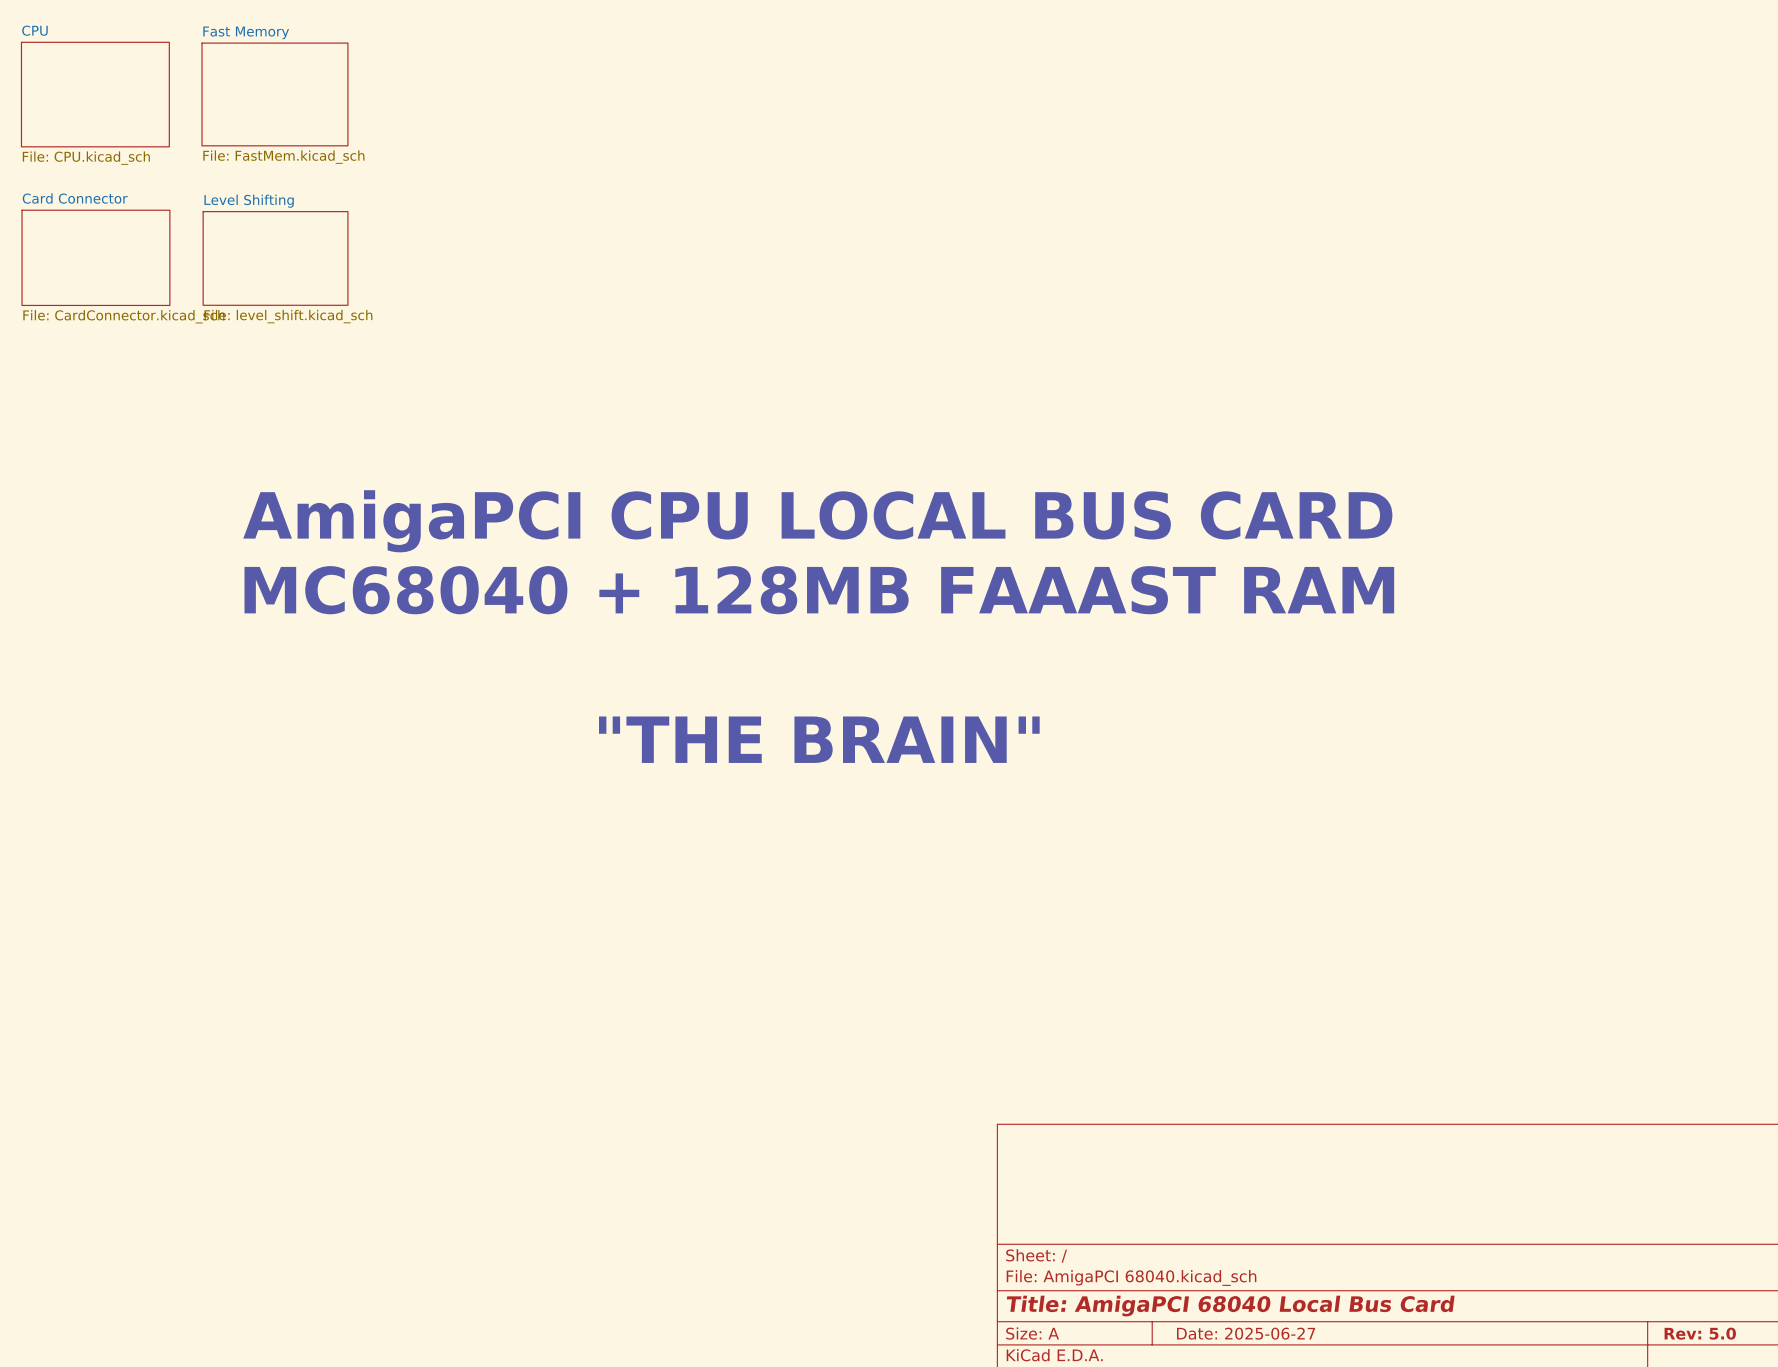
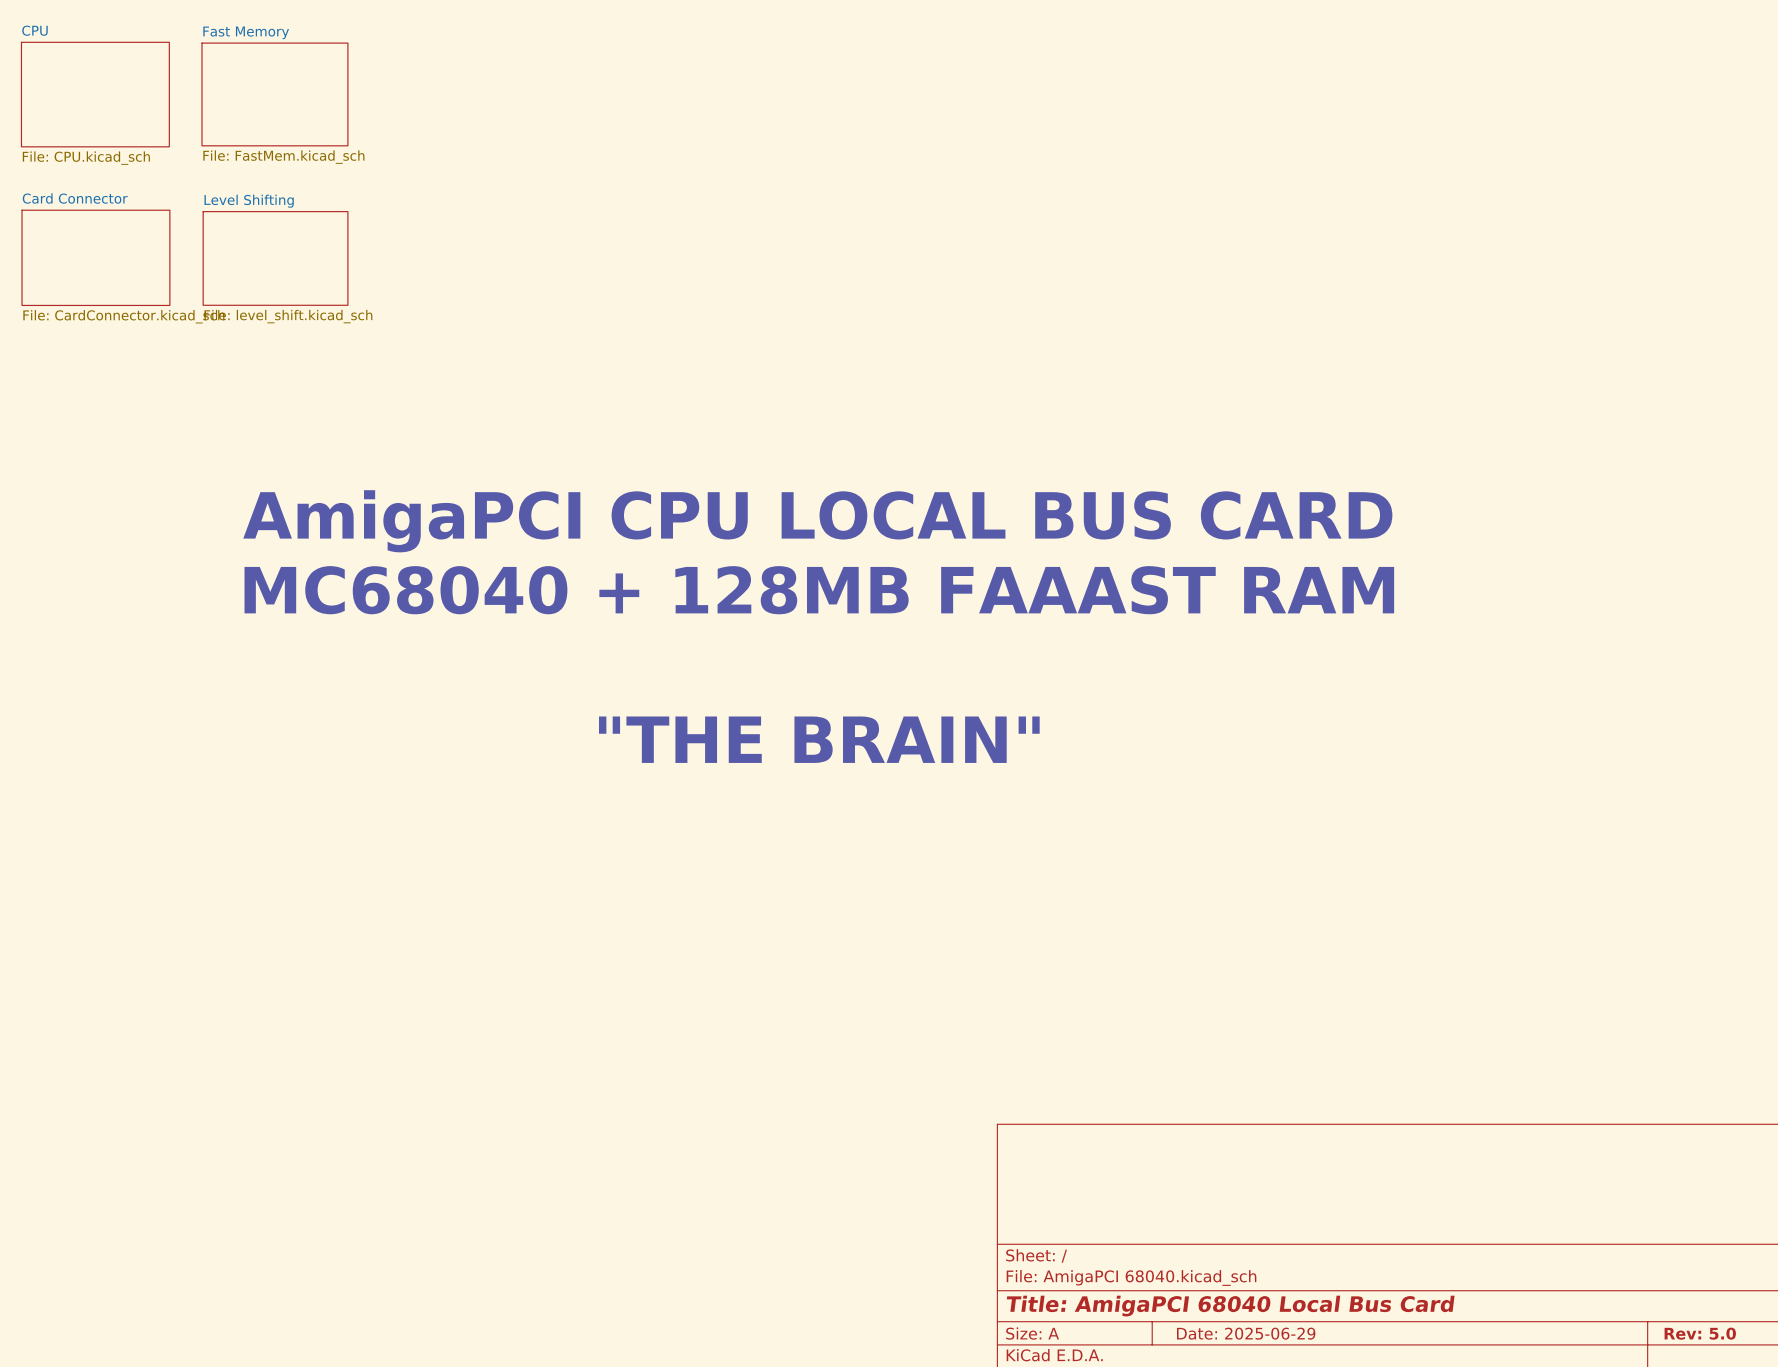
title block: Date: 2025-06-27 (1246, 1333) -> Date: 2025-06-29 (1246, 1333)

